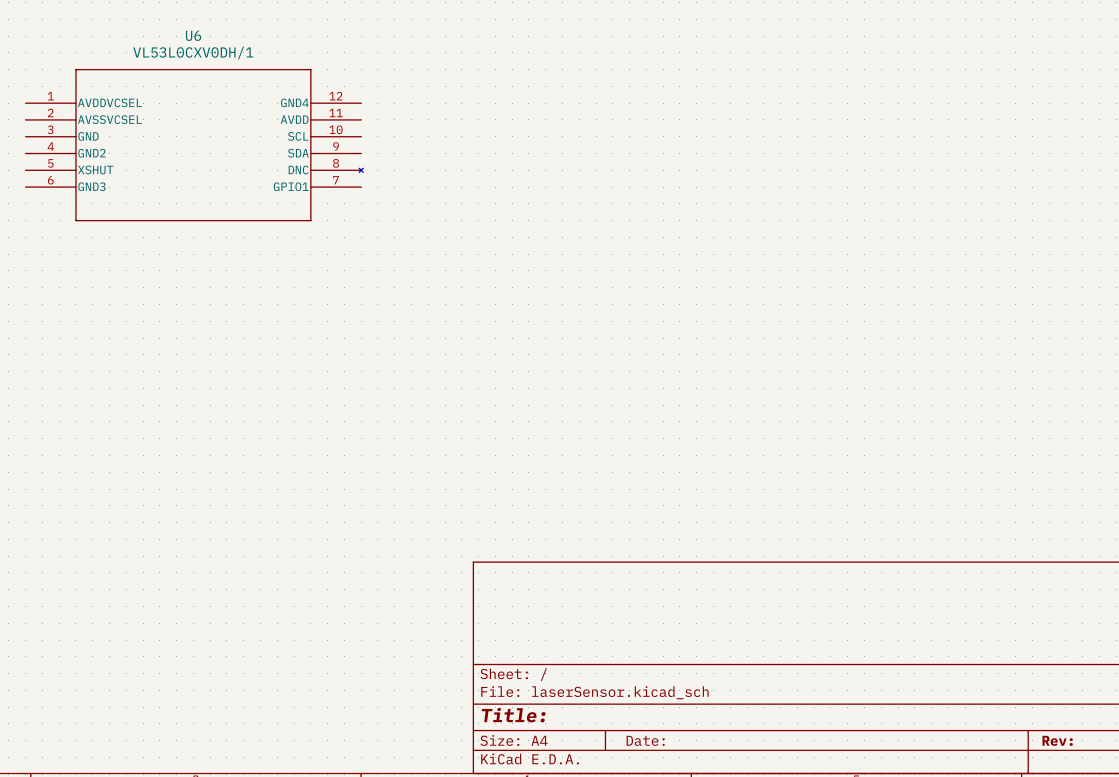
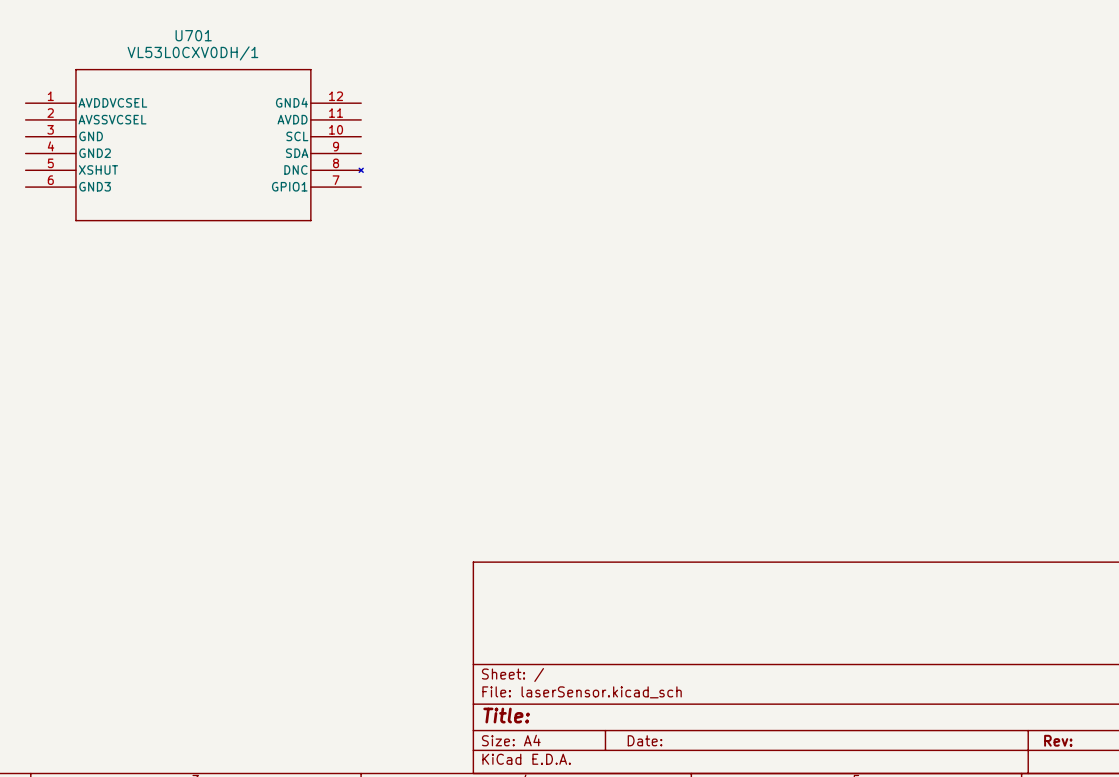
U6 name: U6 (193, 35) -> U701 (193, 35)

